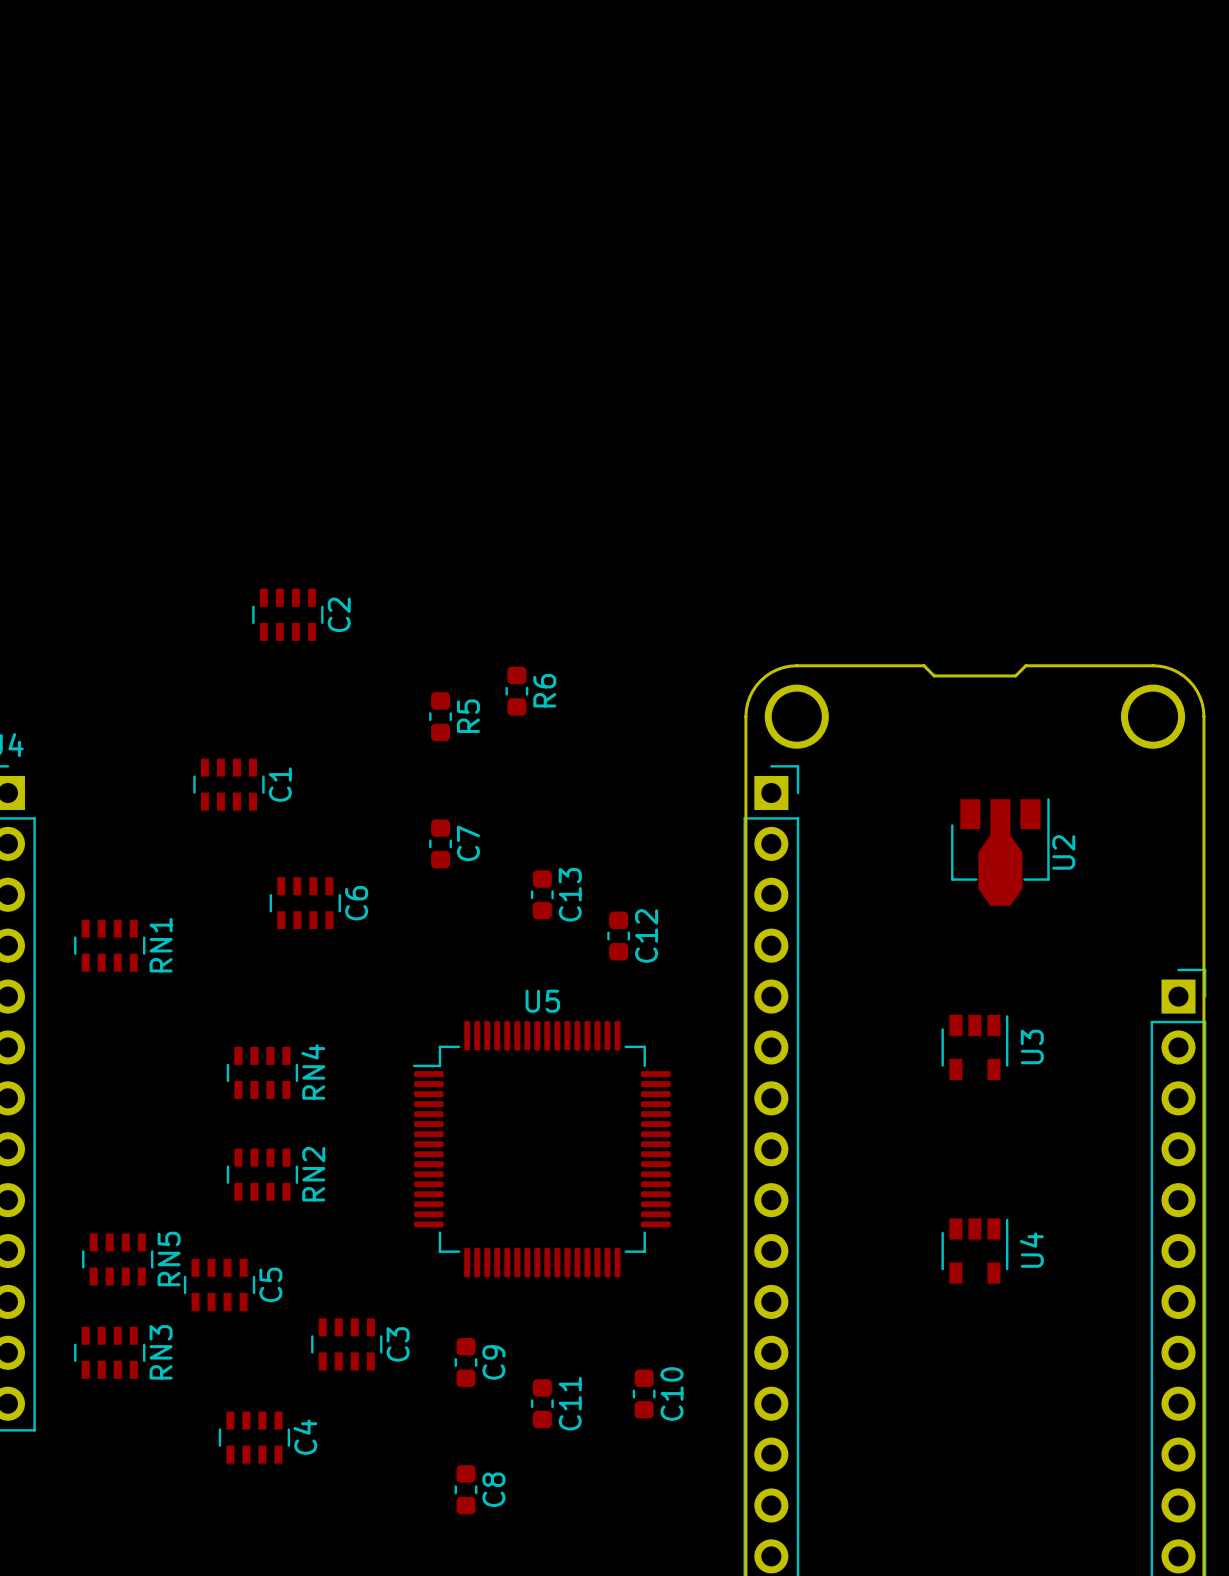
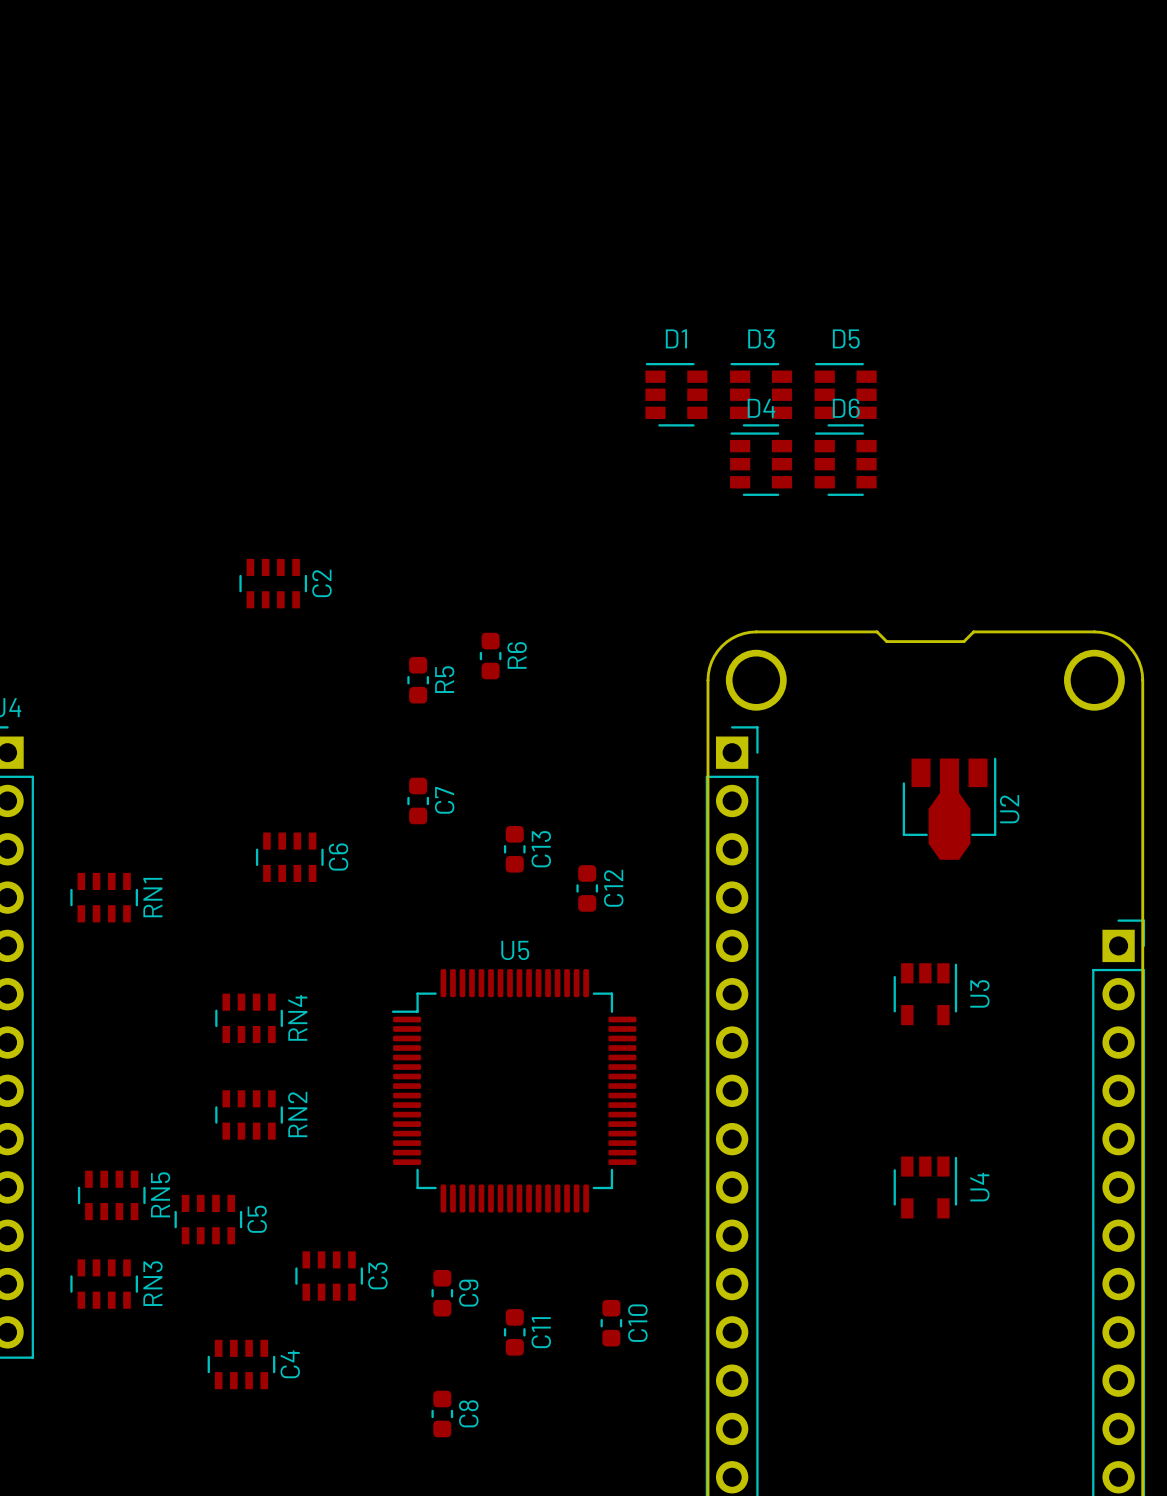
D1: none -> (676, 394)
D3: none -> (761, 394)
D5: none -> (845, 394)
D4: none -> (761, 464)
D6: none -> (845, 464)
C1: (228, 784) -> none

